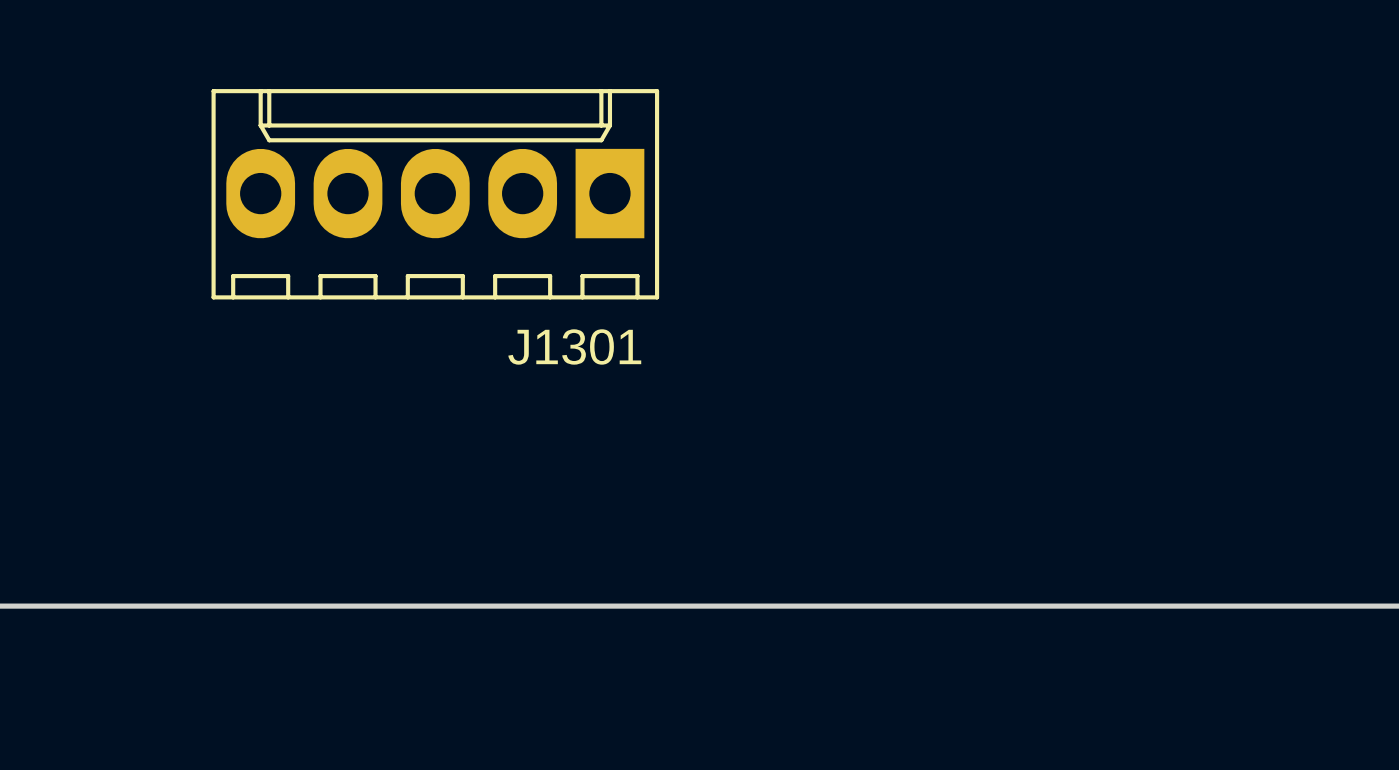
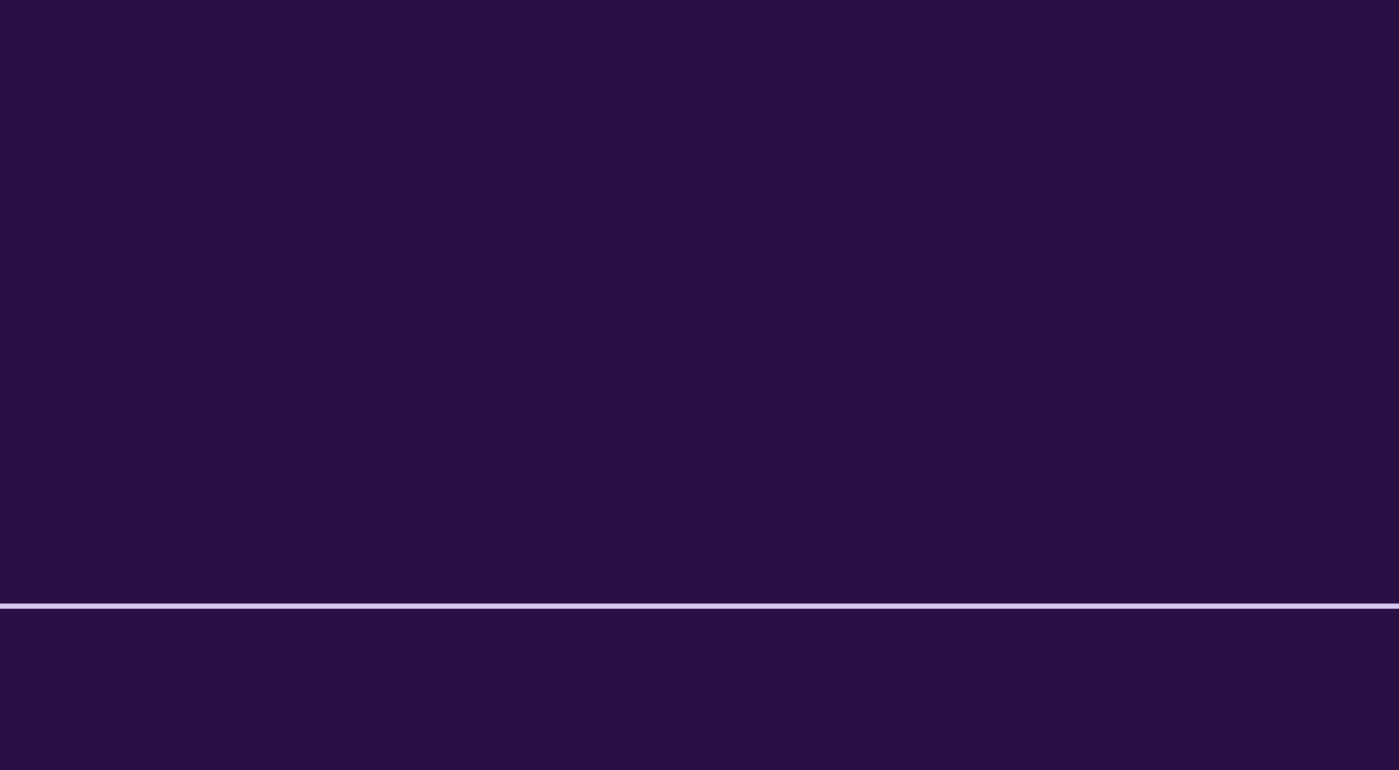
J1301: (435, 194) -> none

